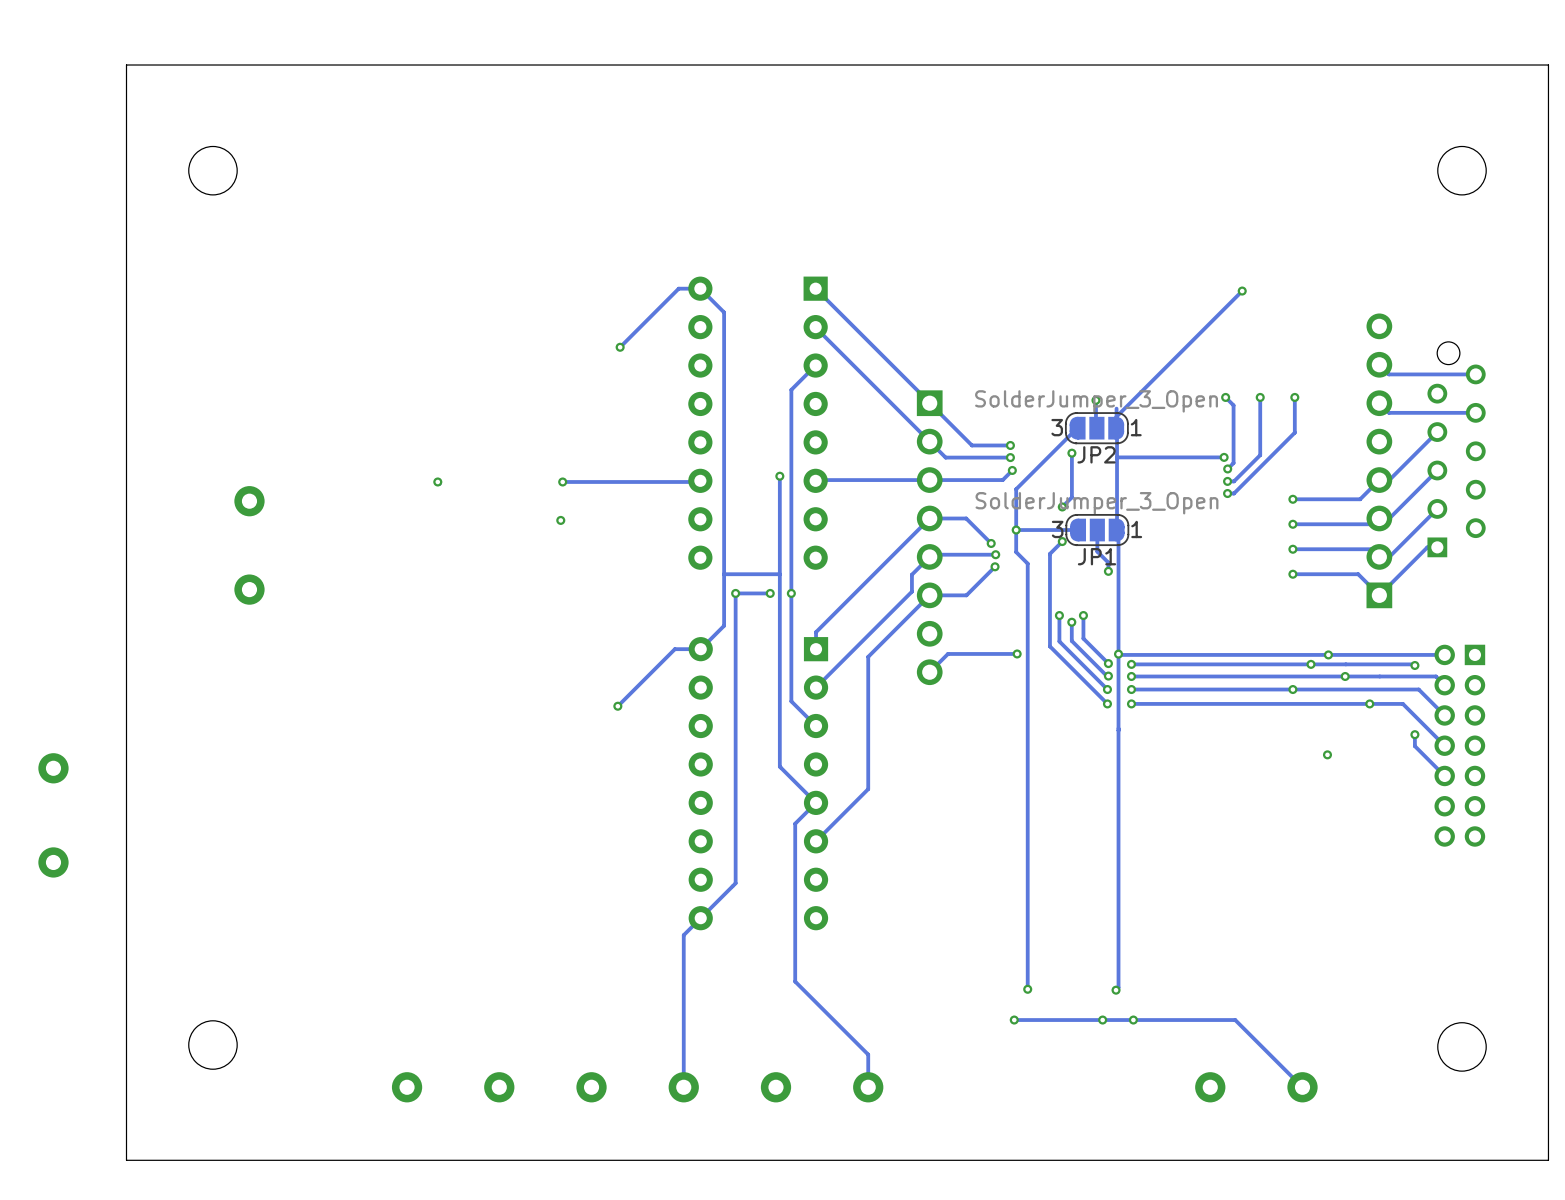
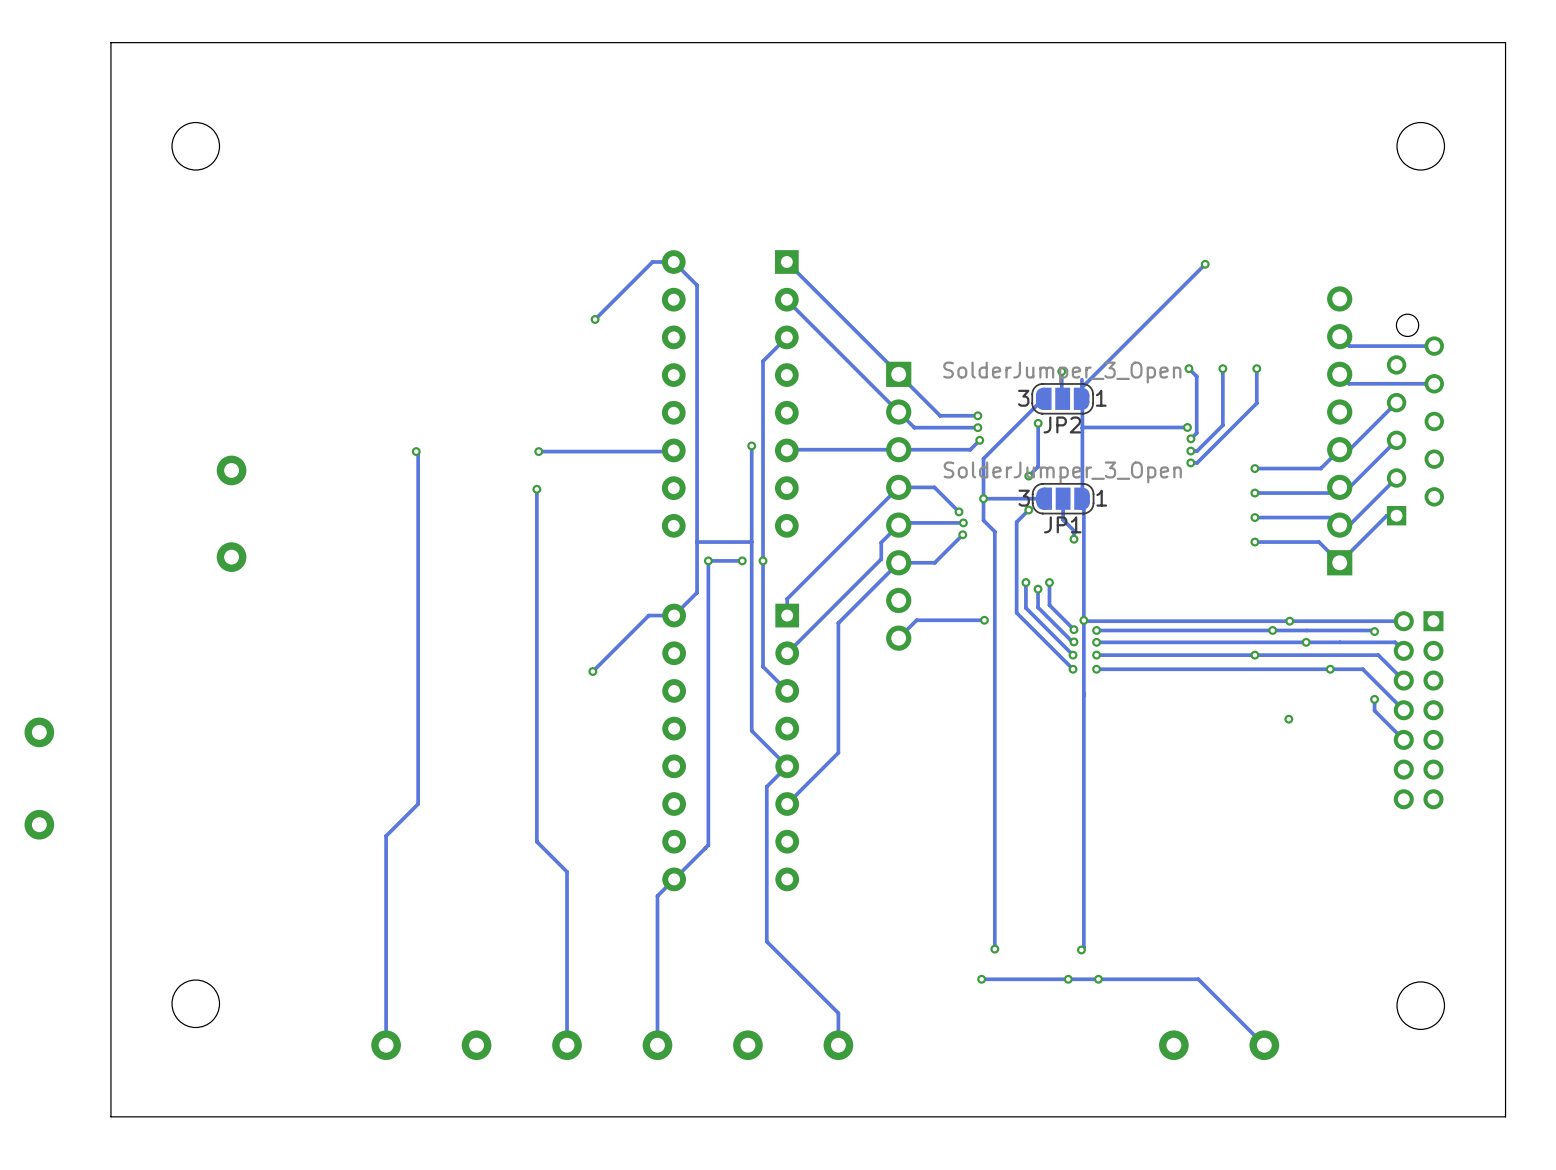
track: none -> (418, 453) (418, 804) (386, 836) (386, 1045)
track: none -> (536, 489) (536, 841) (567, 871) (567, 1045)

